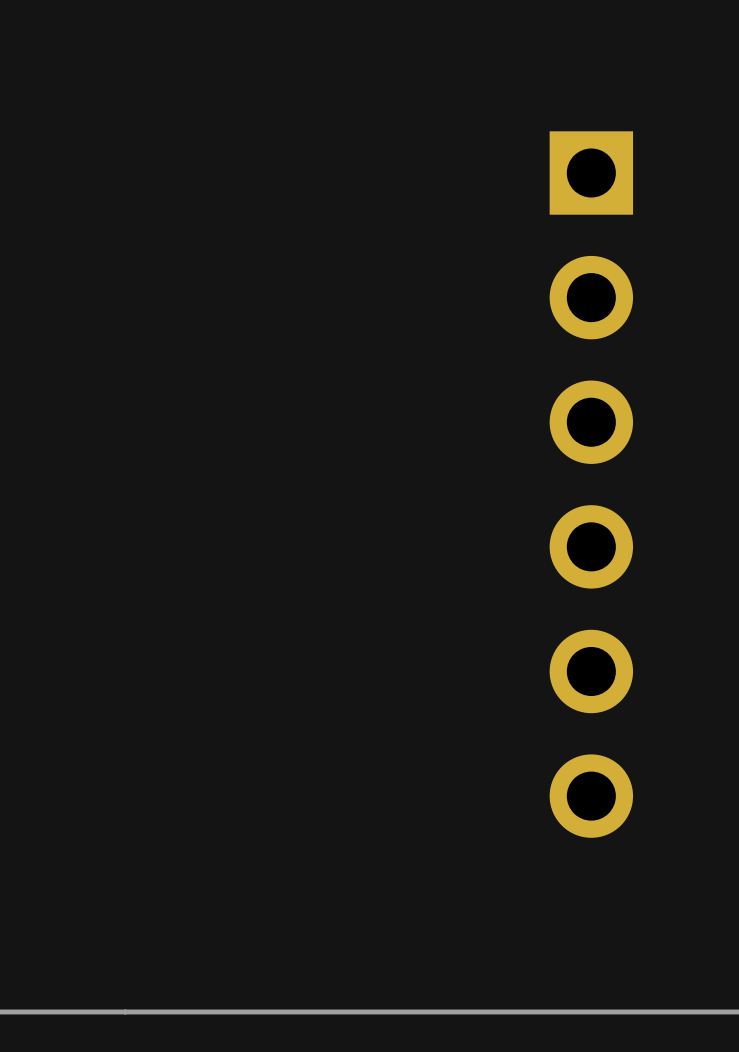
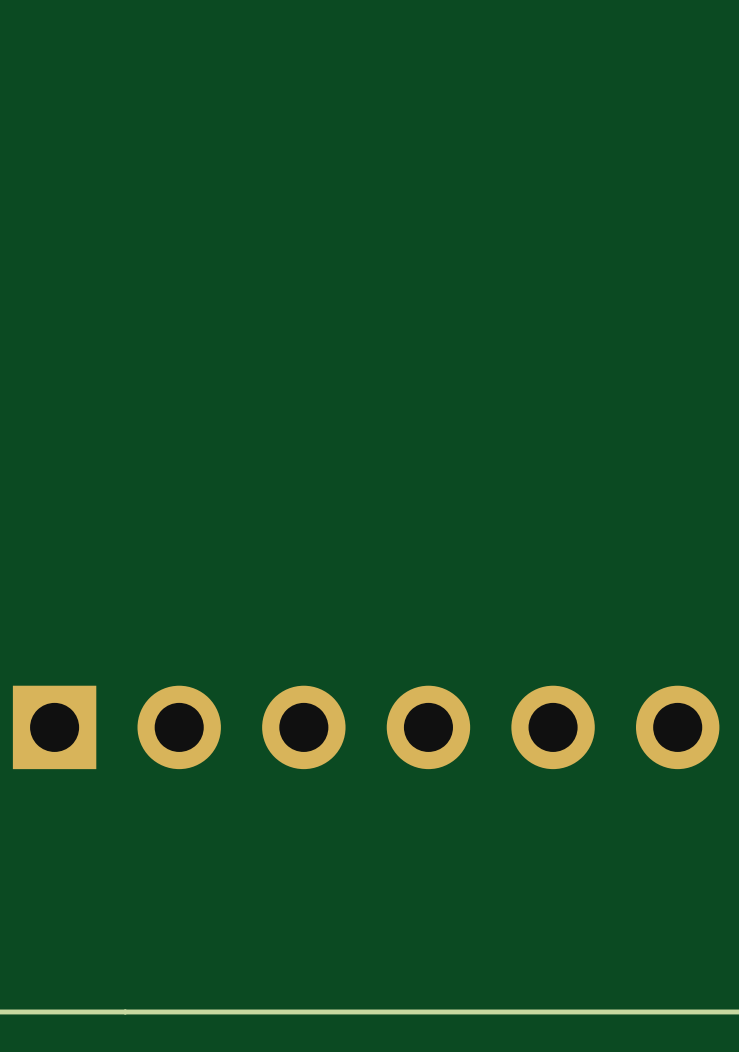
part rotation: 0° (591, 484) -> 90° counterclockwise (366, 727)

